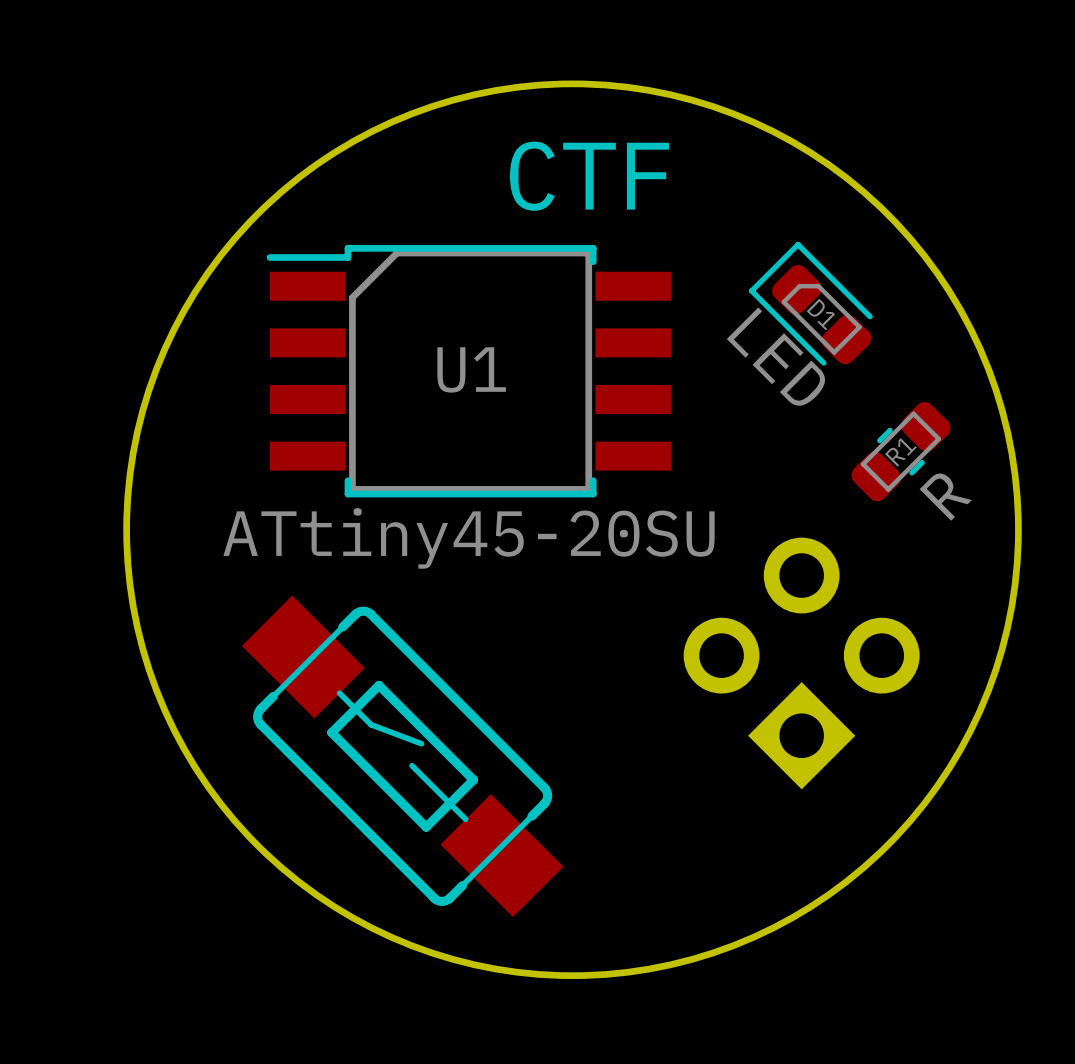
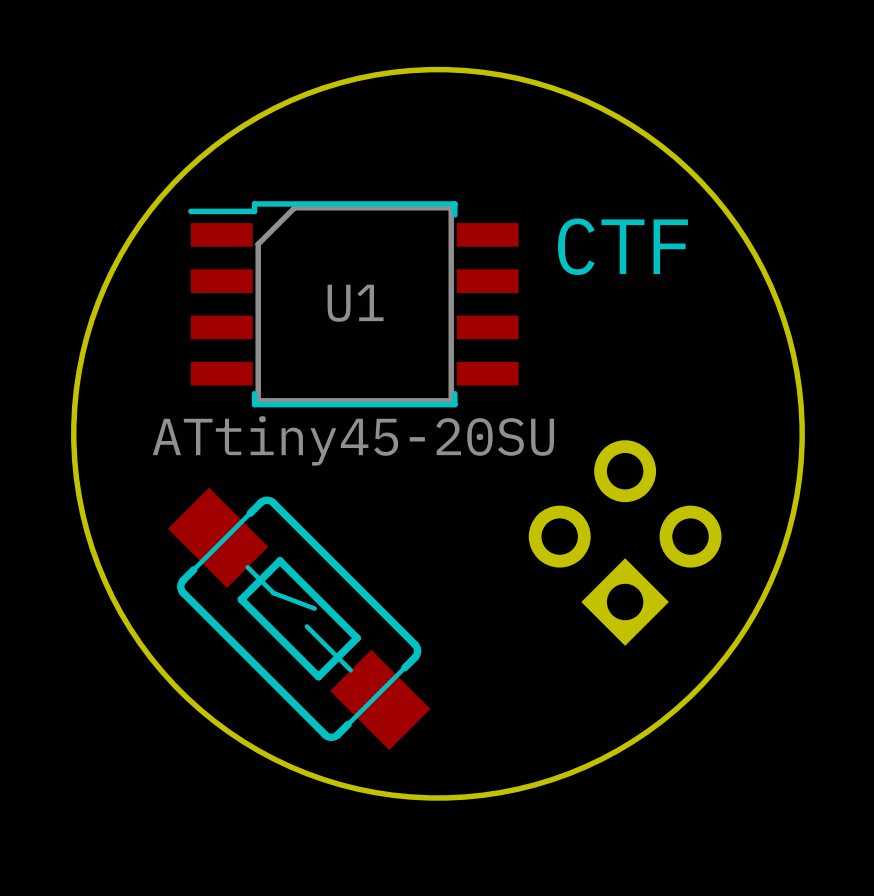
text position: CTF (589, 176) -> CTF (622, 246)
D1: LED (810, 303) -> none
R1: R (900, 451) -> none

